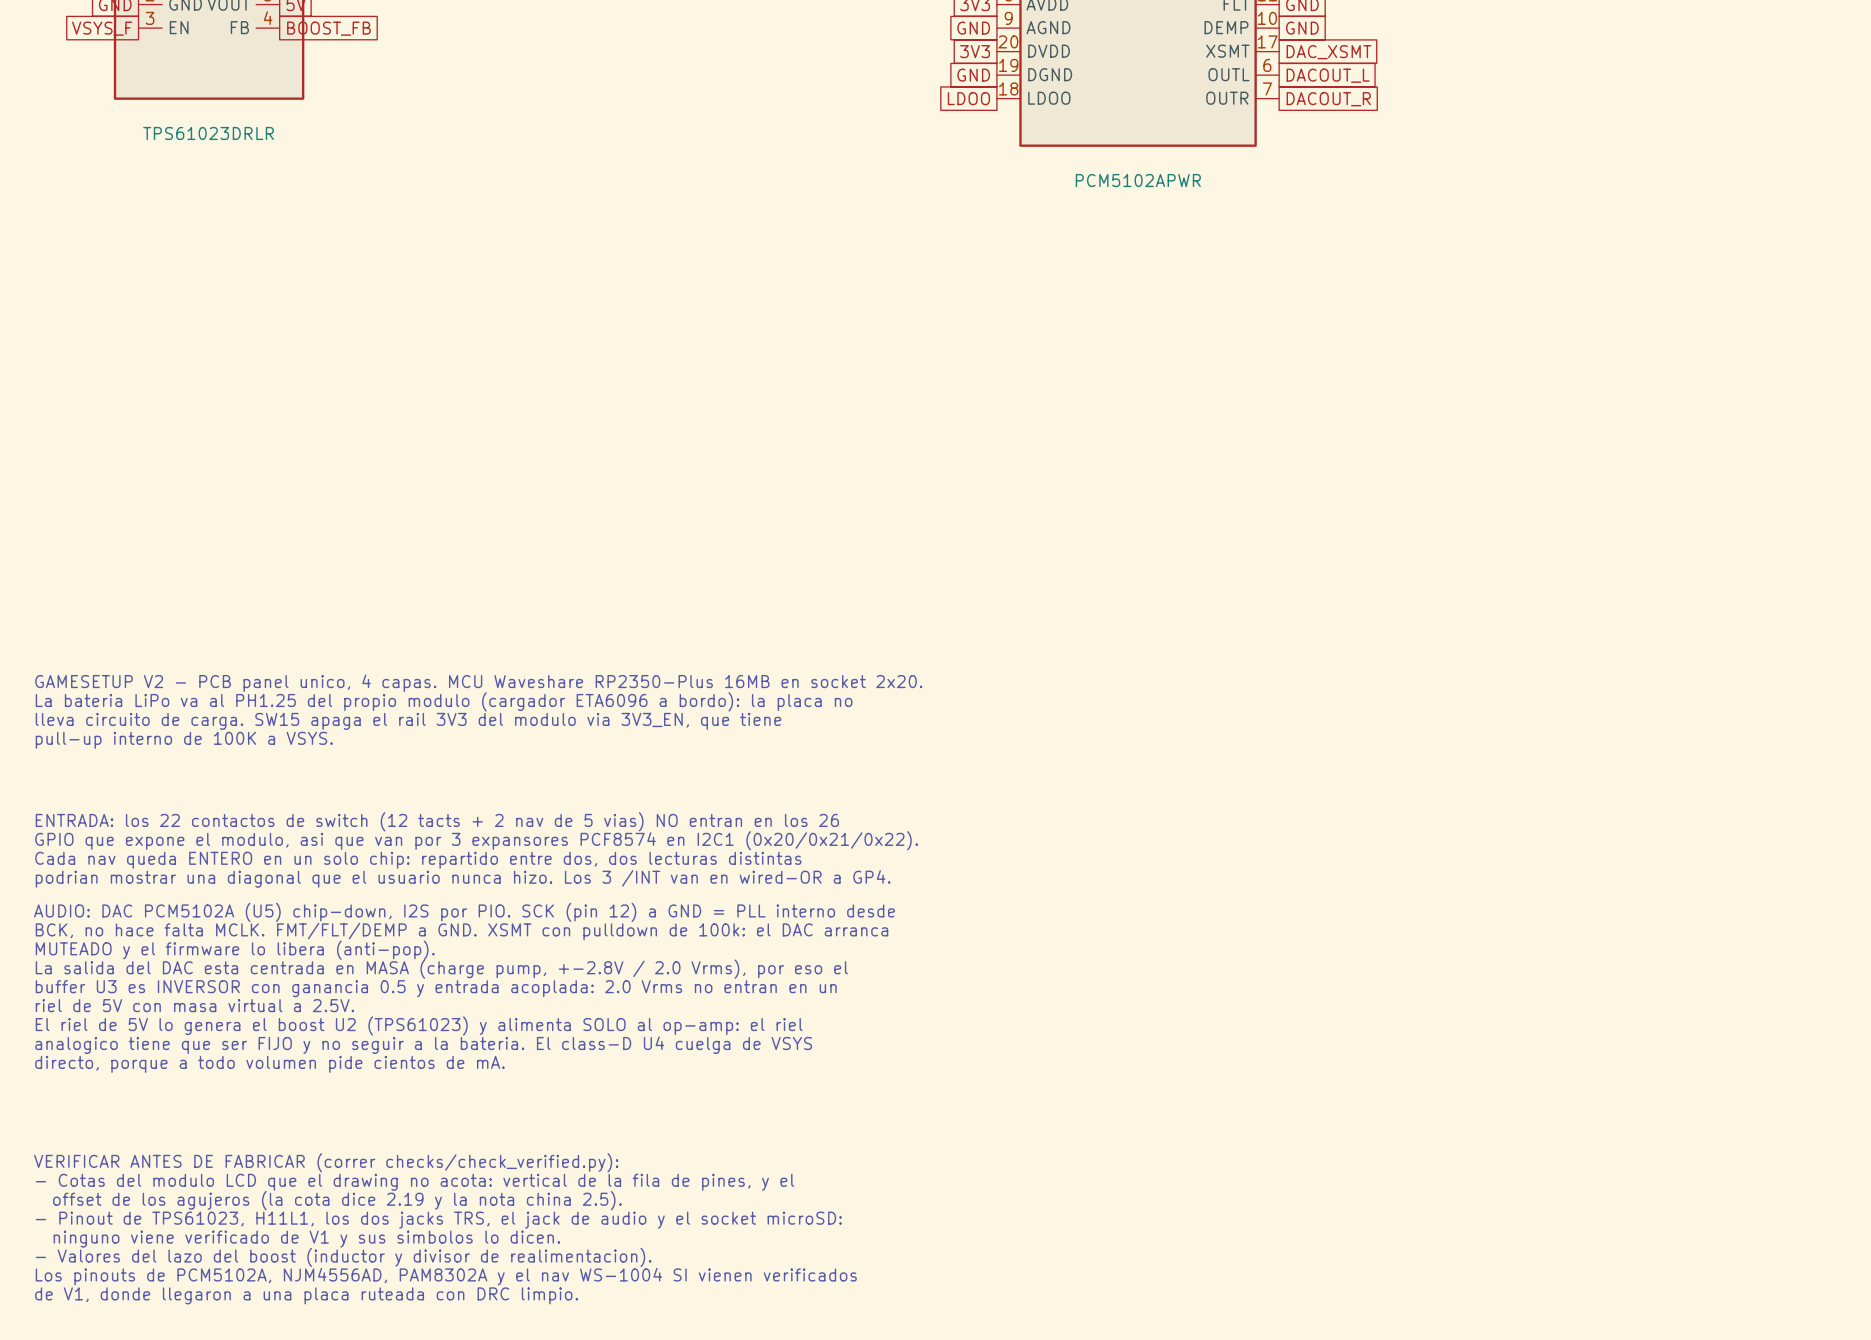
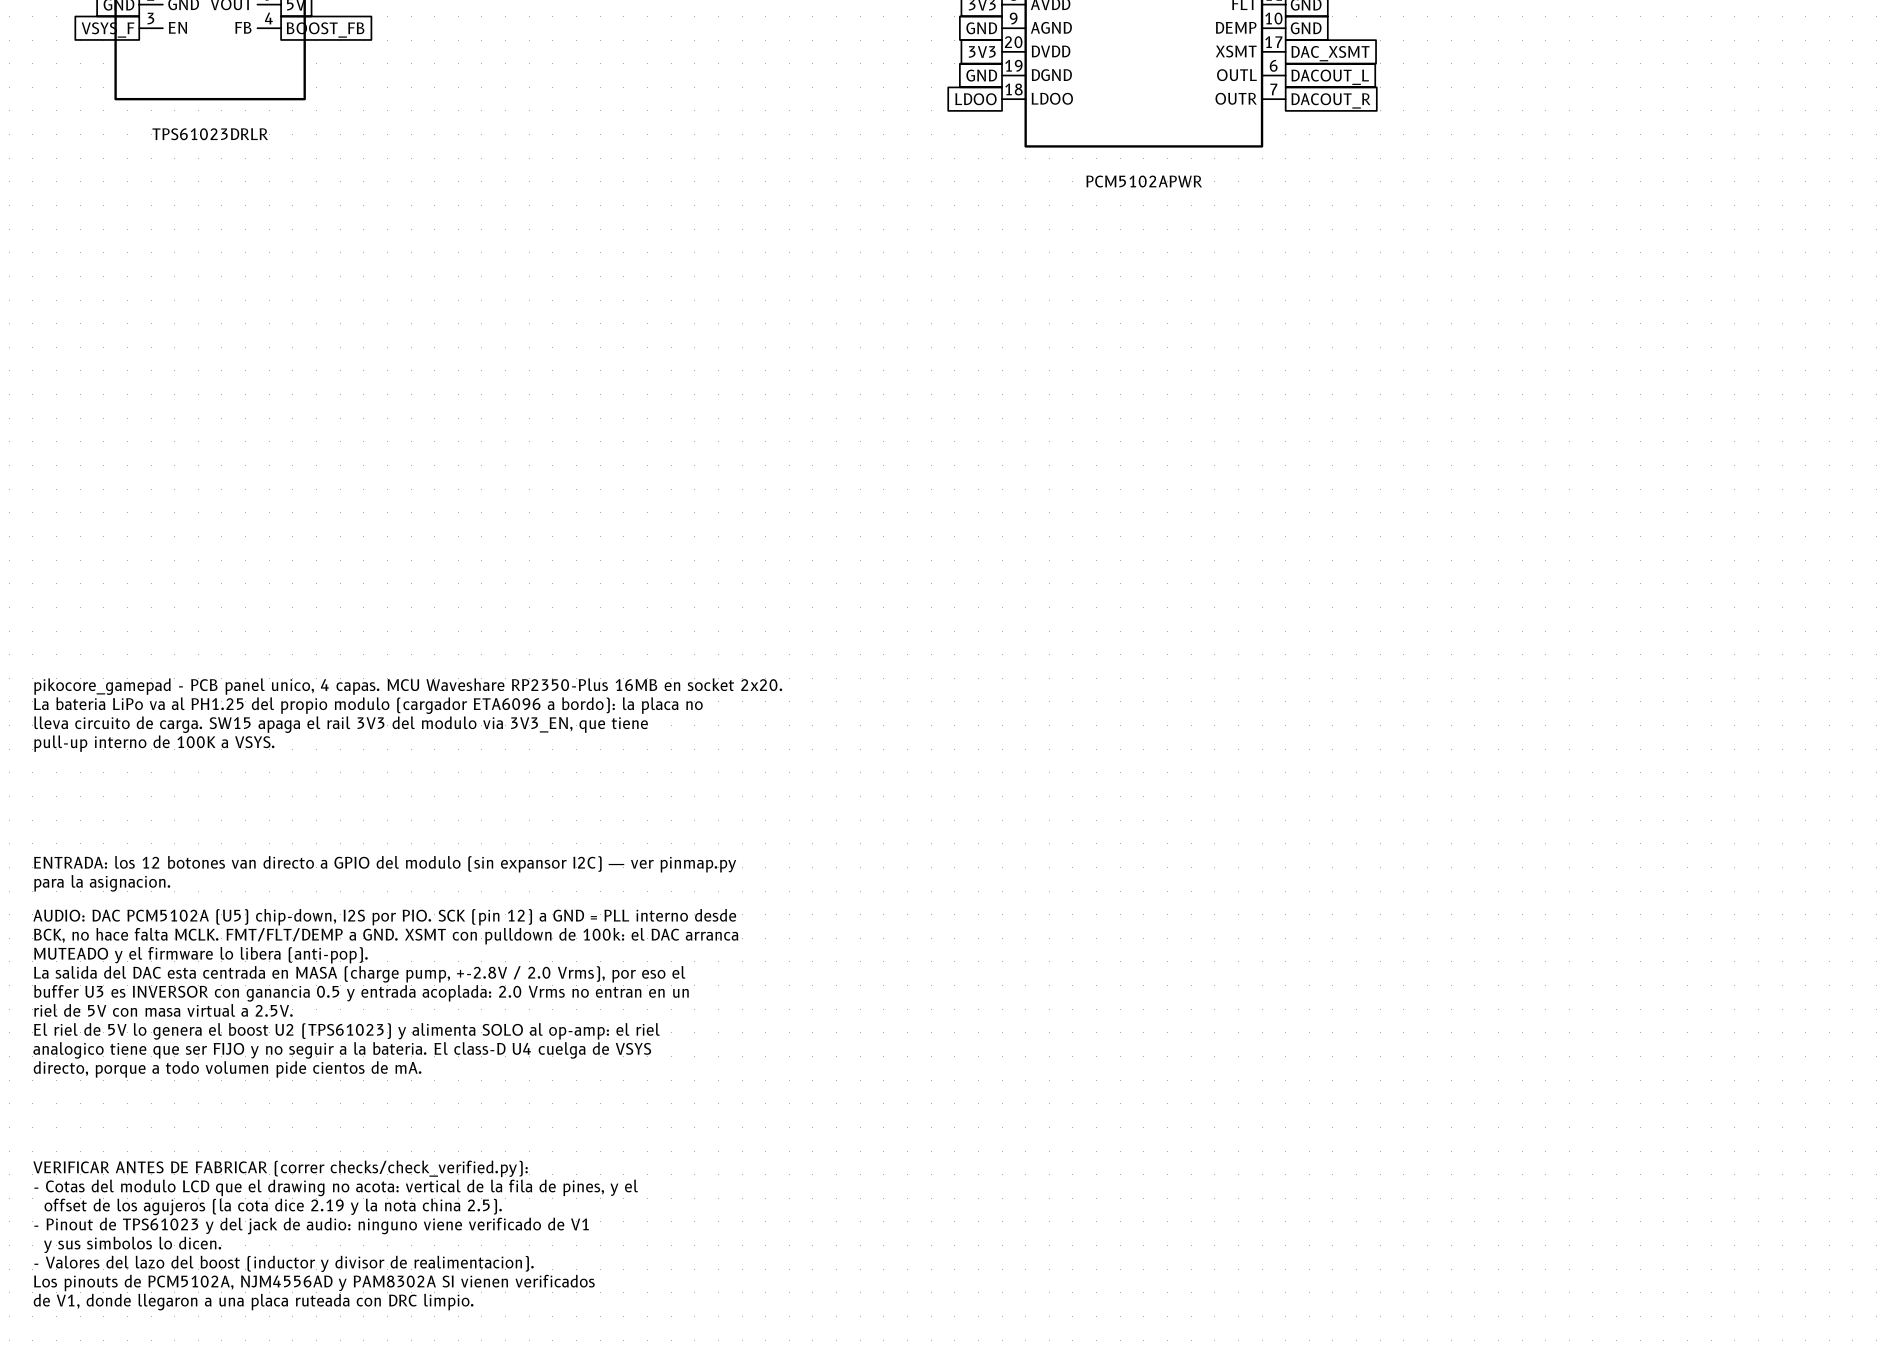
text: GAMESETUP V2 - PCB panel unico, 4 capas. MCU Waveshare RP2350-Plus 16MB en socket 2x20. (478, 683) -> pikocore_gamepad - PCB panel unico, 4 capas. MCU Waveshare RP2350-Plus 16MB en socket 2x20. (408, 686)
text: ENTRADA: los 22 contactos de switch (12 tacts + 2 nav de 5 vias) NO entran en los 26 (437, 821) -> none
text: GPIO que expone el modulo, asi que van por 3 expansores PCF8574 en I2C1 (0x20/0x21/0x22). (476, 840) -> none
text: Cada nav queda ENTERO en un solo chip: repartido entre dos, dos lecturas distintas (418, 860) -> ENTRADA: los 12 botones van directo a GPIO del modulo (sin expansor I2C) — ver pinmap.py (385, 864)
text: podrian mostrar una diagonal que el usuario nunca hizo. Los 3 /INT van en wired-OR a GP4. (463, 878) -> para la asignacion. (102, 883)
text: - Pinout de TPS61023, H11L1, los dos jacks TRS, el jack de audio y el socket microSD: (438, 1220) -> - Pinout de TPS61023 y del jack de audio: ninguno viene verificado de V1 (311, 1226)
text: ninguno viene verificado de V1 y sus simbolos lo dicen. (306, 1239) -> y sus simbolos lo dicen. (132, 1244)
text: Los pinouts de PCM5102A, NJM4556AD, PAM8302A y el nav WS-1004 SI vienen verificados (446, 1276) -> Los pinouts de PCM5102A, NJM4556AD y PAM8302A SI vienen verificados (314, 1283)

